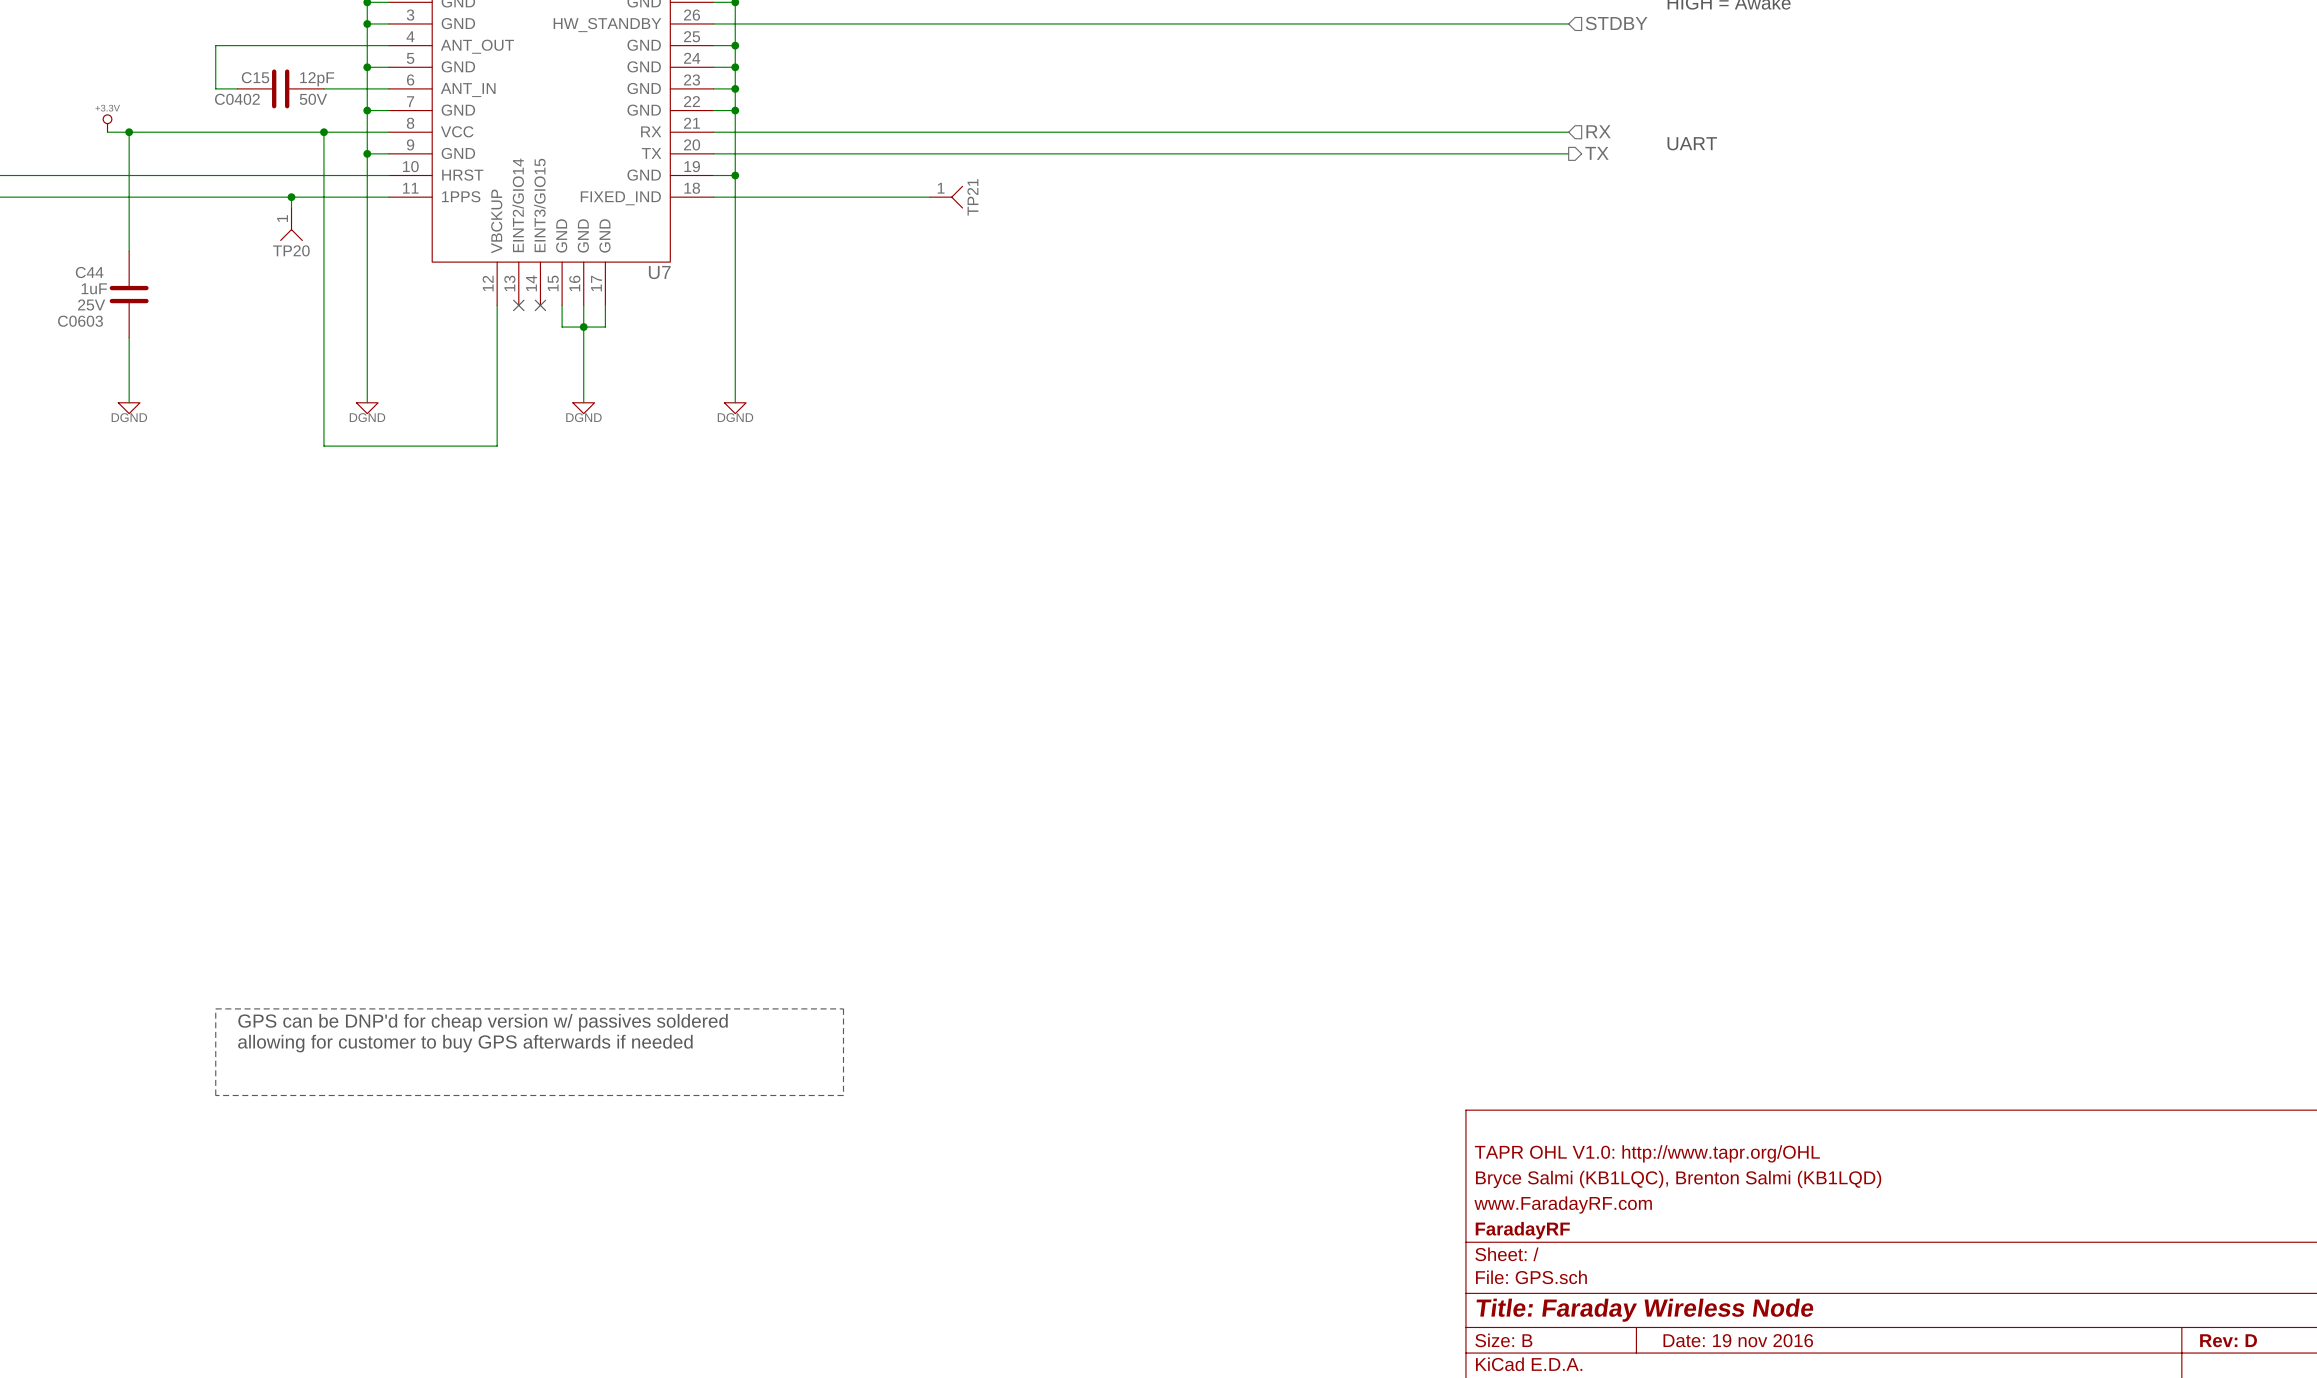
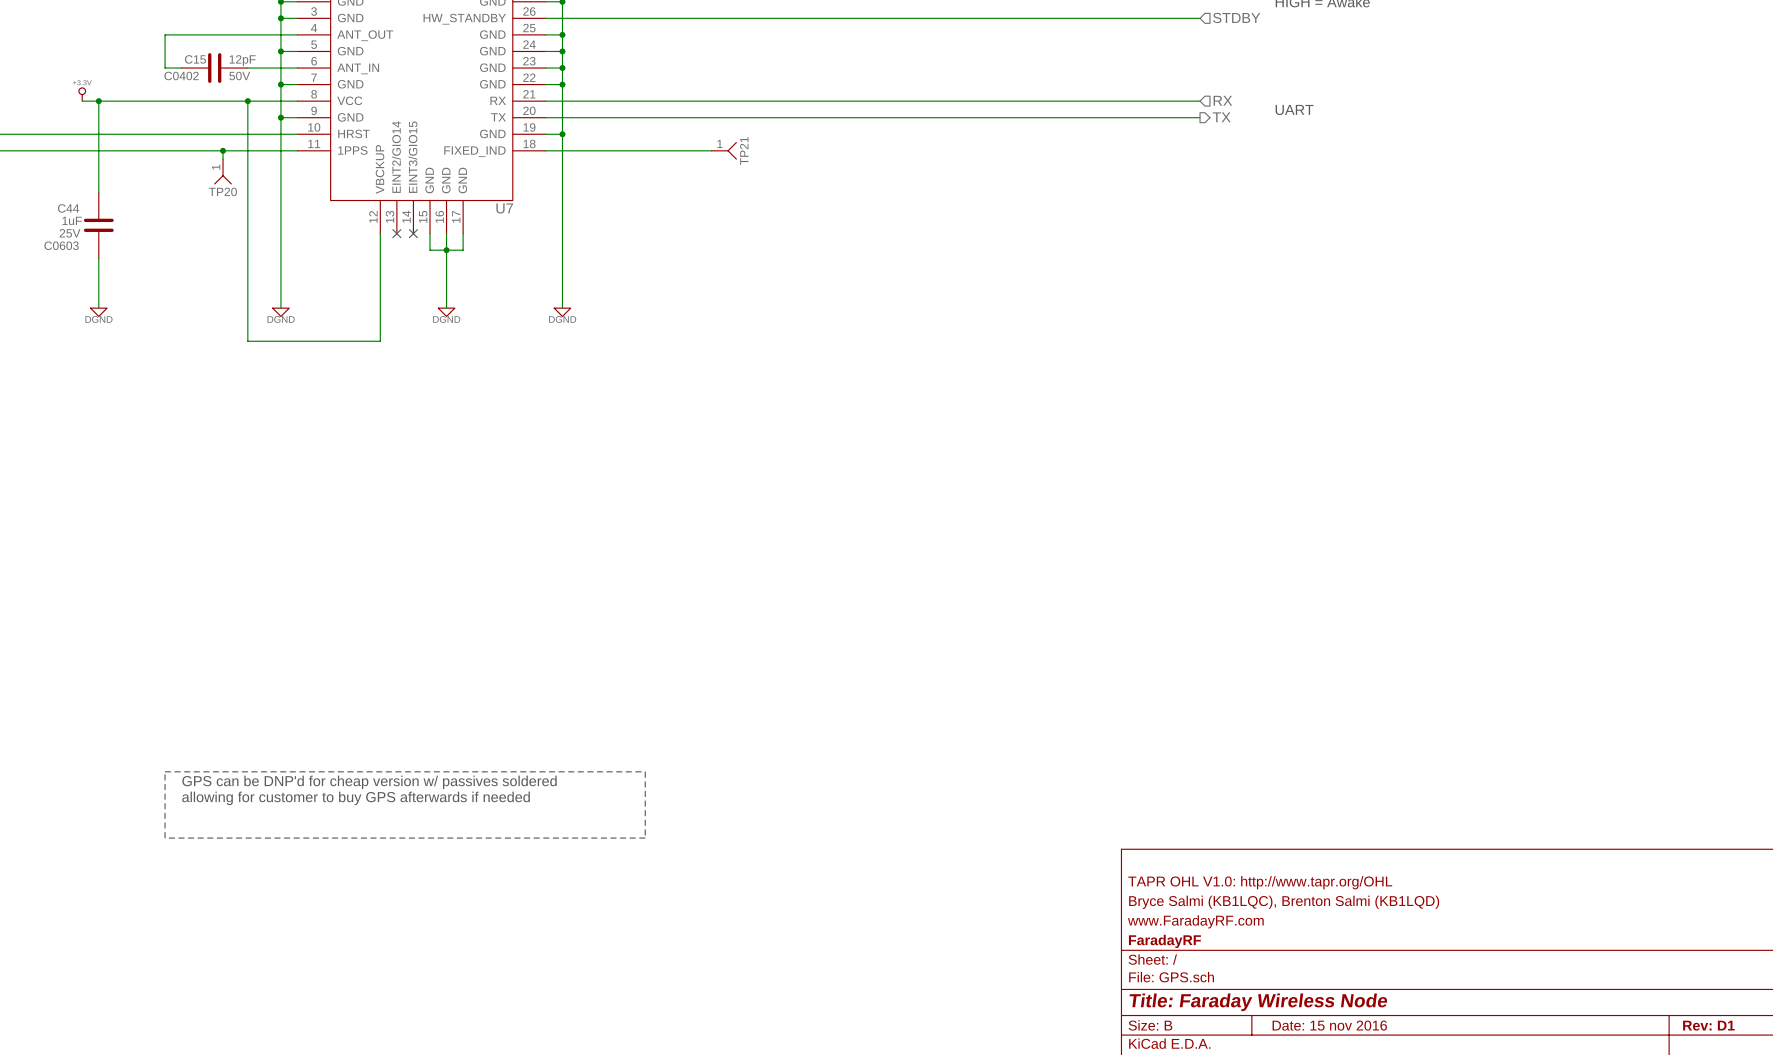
title block: Date: 19 nov 2016 (1738, 1340) -> Date: 15 nov 2016 (1329, 1025)
title block: Rev: D (2228, 1340) -> Rev: D1 (1708, 1025)

